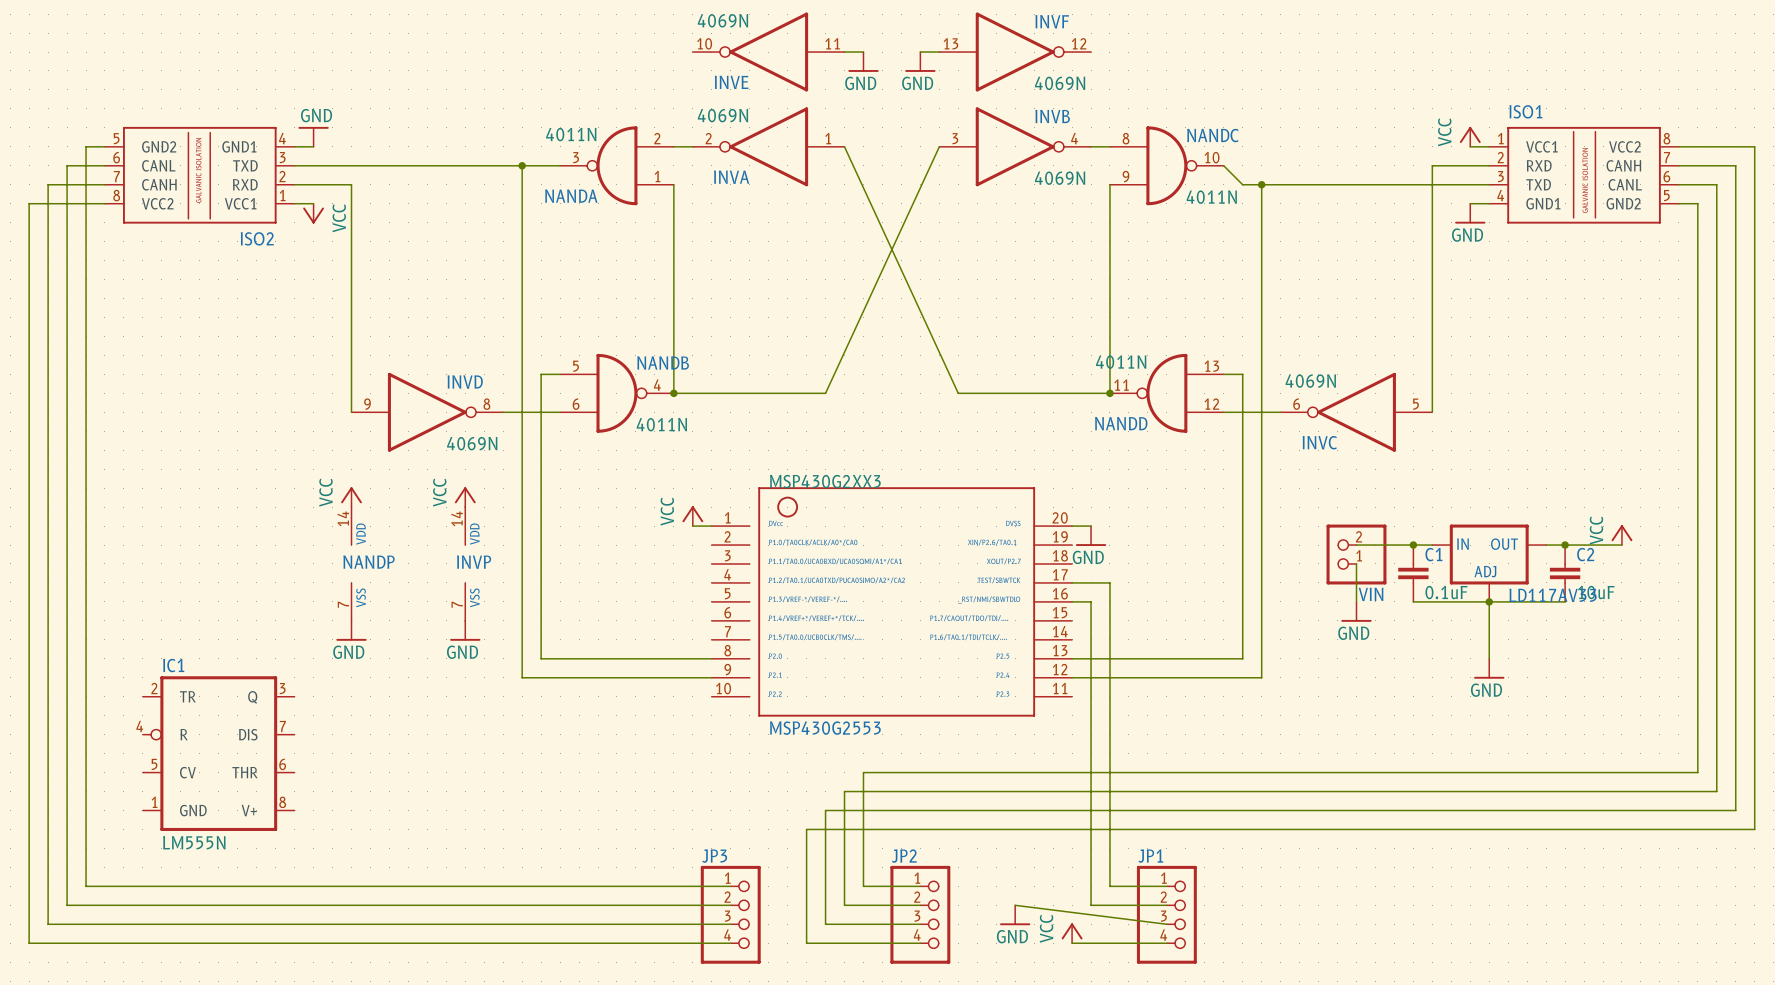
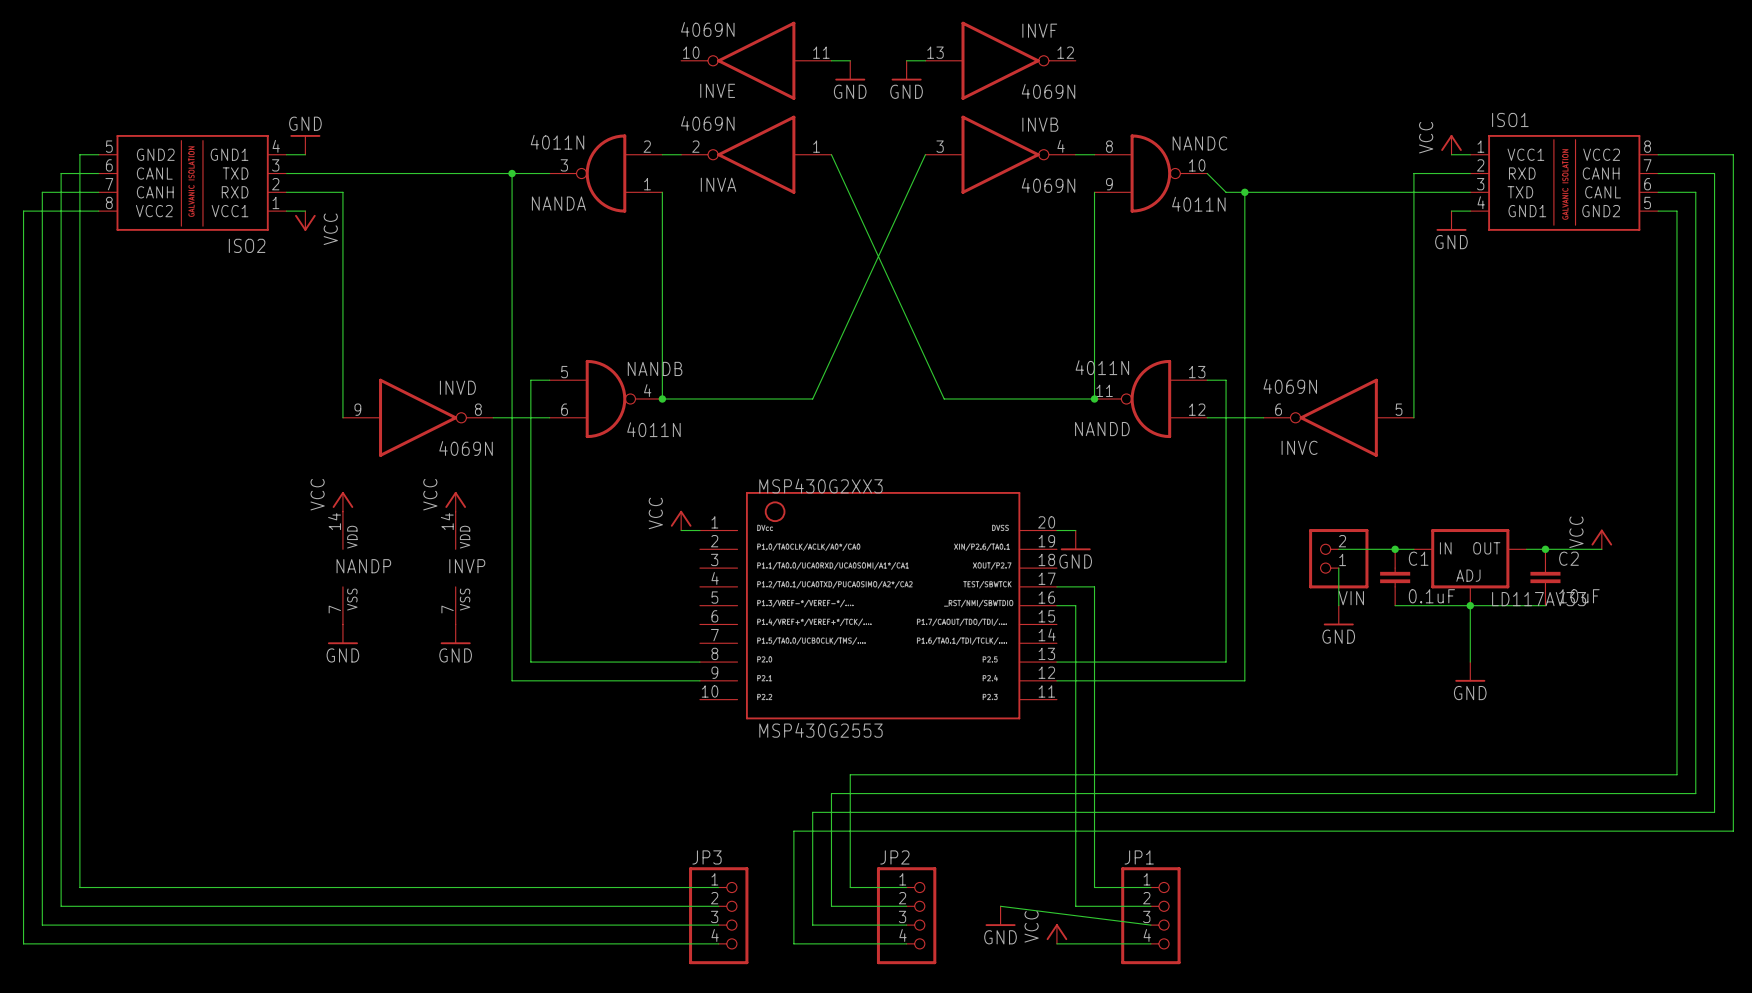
IC1: LM555N (218, 753) -> none

